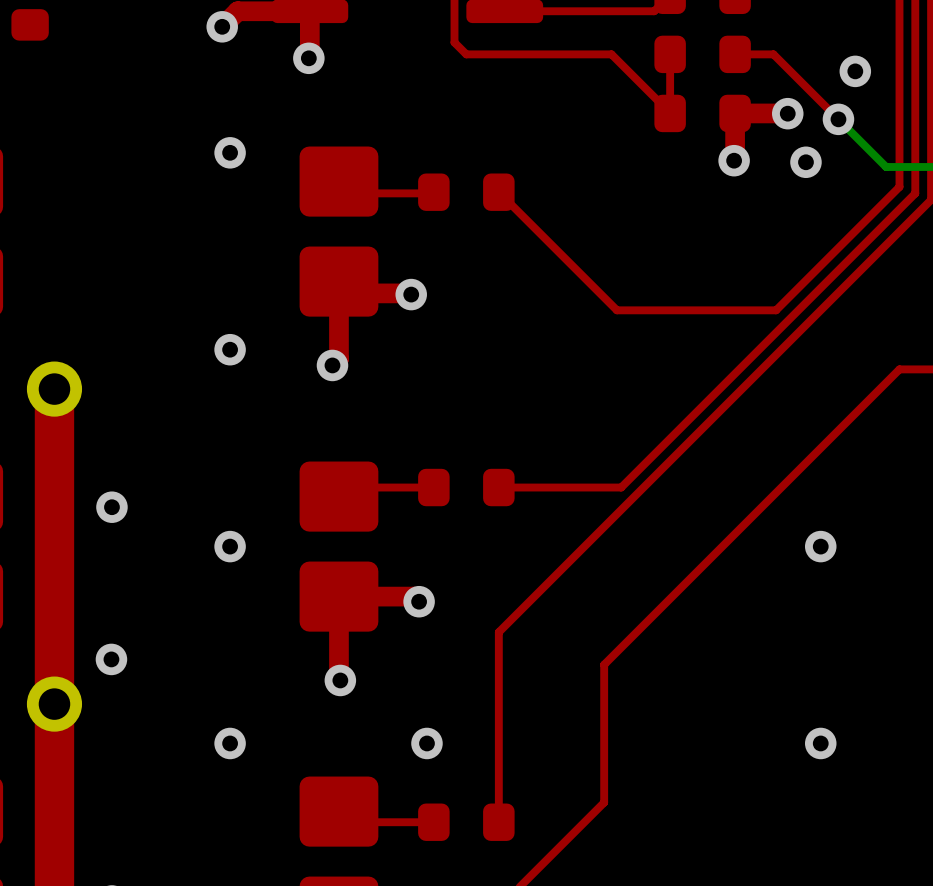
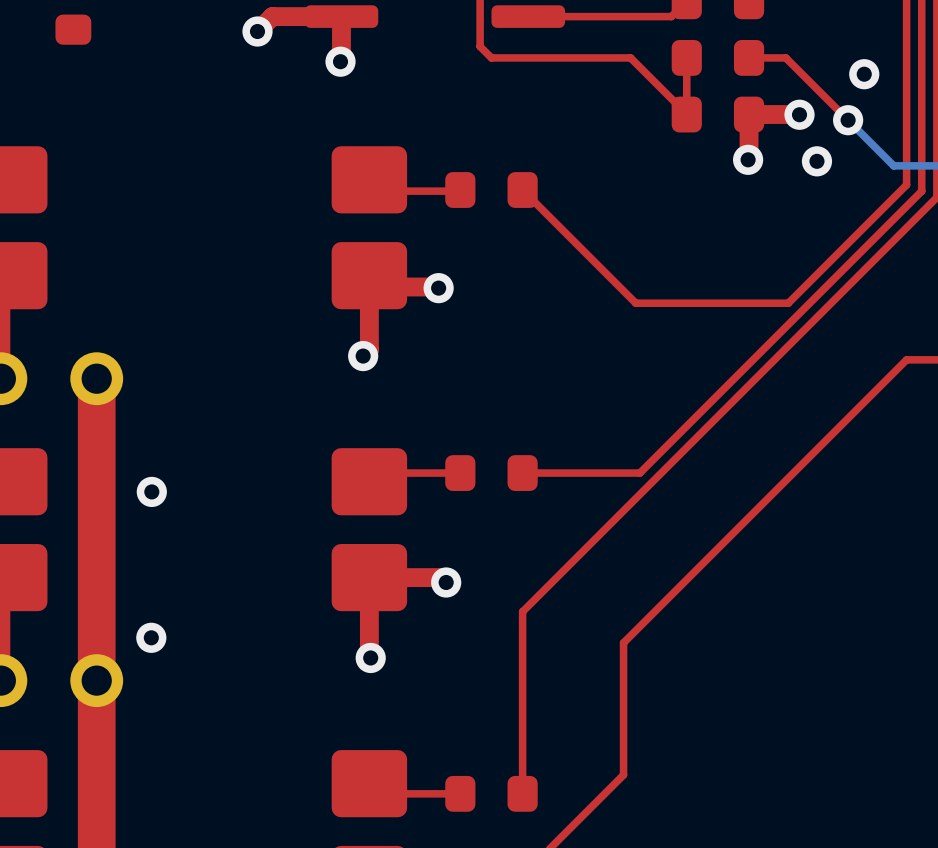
via: (230, 152) -> none
via: (230, 349) -> none
via: (230, 546) -> none
via: (820, 546) -> none
via: (230, 743) -> none
via: (426, 743) -> none
via: (820, 743) -> none

